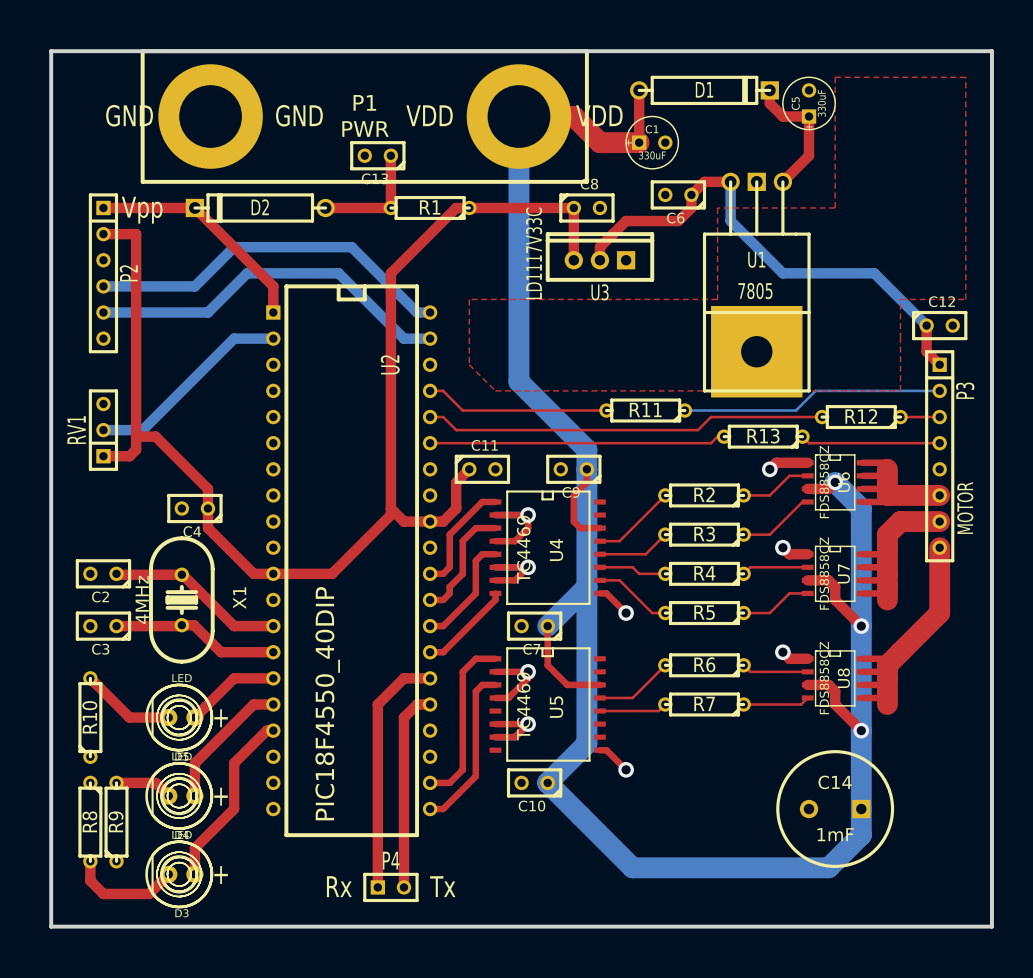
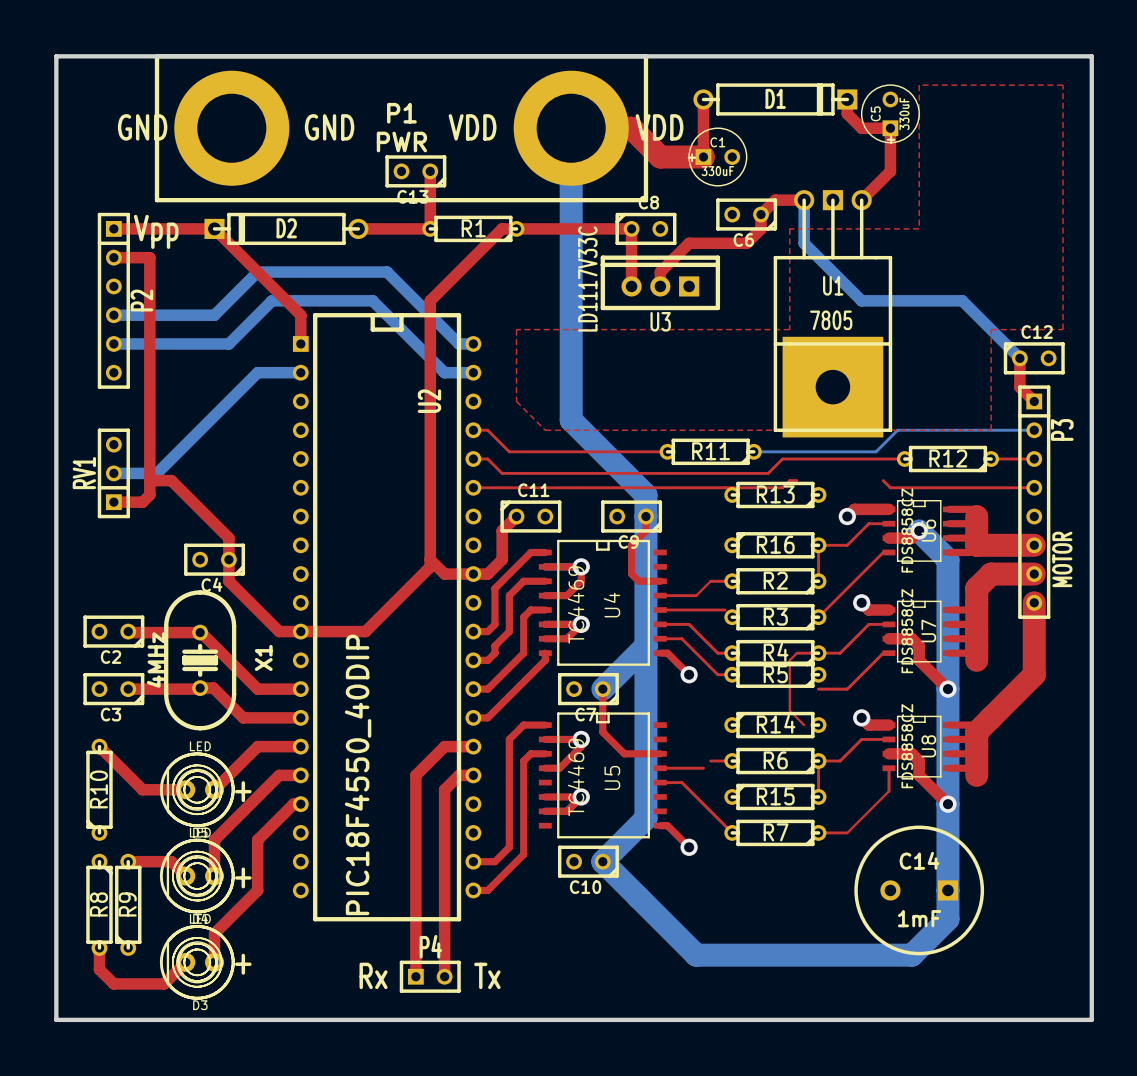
R13 position: (763, 436) -> (775, 494)
top track: (665, 495) (619, 541) -> (710, 581) (696, 595) (681, 595)
R2 position: (704, 495) -> (775, 581)
R16: none -> (775, 545)
top track: none -> (818, 545) (818, 581)
top track: none -> (710, 581) (732, 581) (710, 581)
top track: (665, 534) (645, 554) -> (725, 610) (710, 610)
R3 position: (704, 534) -> (775, 617)
top track: (743, 534) (769, 534) -> (818, 617) (847, 588)
top track: (626, 567) (632, 567) (639, 573) (665, 573) -> none
top track: (789, 567) (750, 567) (743, 573) -> none
R4 position: (704, 573) -> (775, 653)
top track: none -> (717, 653) (732, 653) (717, 653)
top track: none -> (717, 653) (689, 624) (717, 653)
top track: none -> (840, 653) (796, 653) (789, 660) (789, 710) (804, 725)
top track: none -> (840, 653) (868, 624) (840, 653)
top track: (802, 593) (789, 593) (769, 613) (743, 613) -> none
top track: none -> (847, 689) (883, 653) (847, 689)
top track: none -> (847, 689) (818, 689) (847, 689)
R14: none -> (775, 725)
top track: (665, 665) (632, 697) -> (703, 768) (696, 768)
R6 position: (704, 665) -> (775, 761)
top track: (743, 665) (750, 671) (782, 671) -> none
top track: none -> (710, 761) (732, 761)
top track: none -> (840, 761) (818, 761) (818, 796)
top track: none -> (840, 761) (861, 739) (840, 761)
top track: (807, 697) (801, 704) (743, 704) -> none
top track: (665, 704) (658, 711) (619, 711) -> (681, 782) (732, 832) (681, 782)
R7 position: (704, 704) -> (775, 832)
top track: none -> (889, 791) (889, 768) (889, 791)
top track: none -> (889, 791) (847, 832) (818, 832)
R15: none -> (775, 796)

